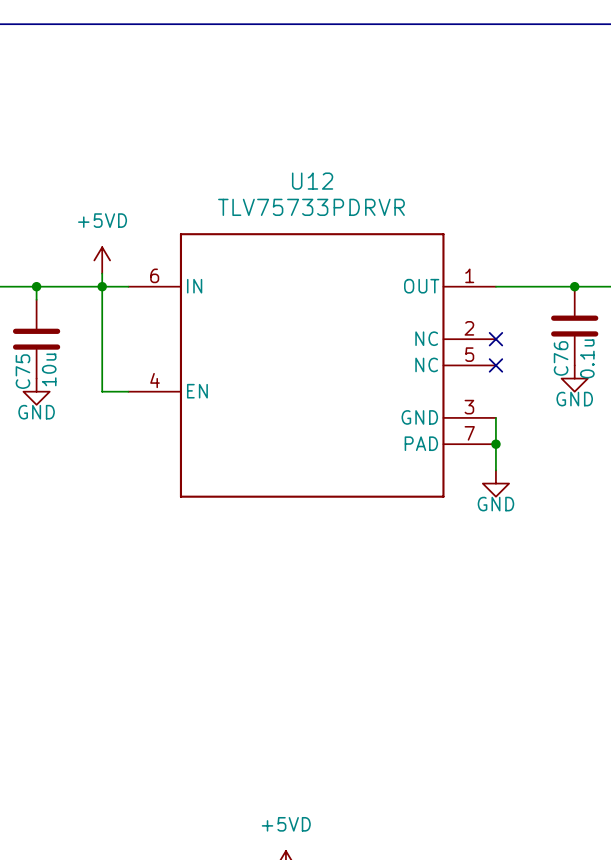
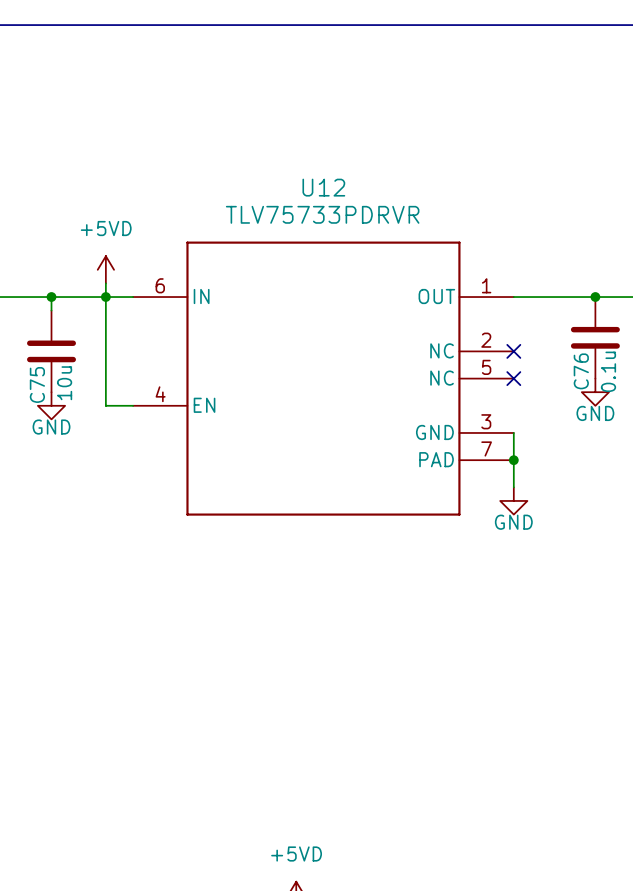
wire: (36, 286) (36, 299) -> (51, 297) (51, 310)
junction position: (36, 286) -> (51, 297)
C75 position: (36, 339) -> (51, 351)
power symbol position: GND (36, 391) -> GND (51, 405)

